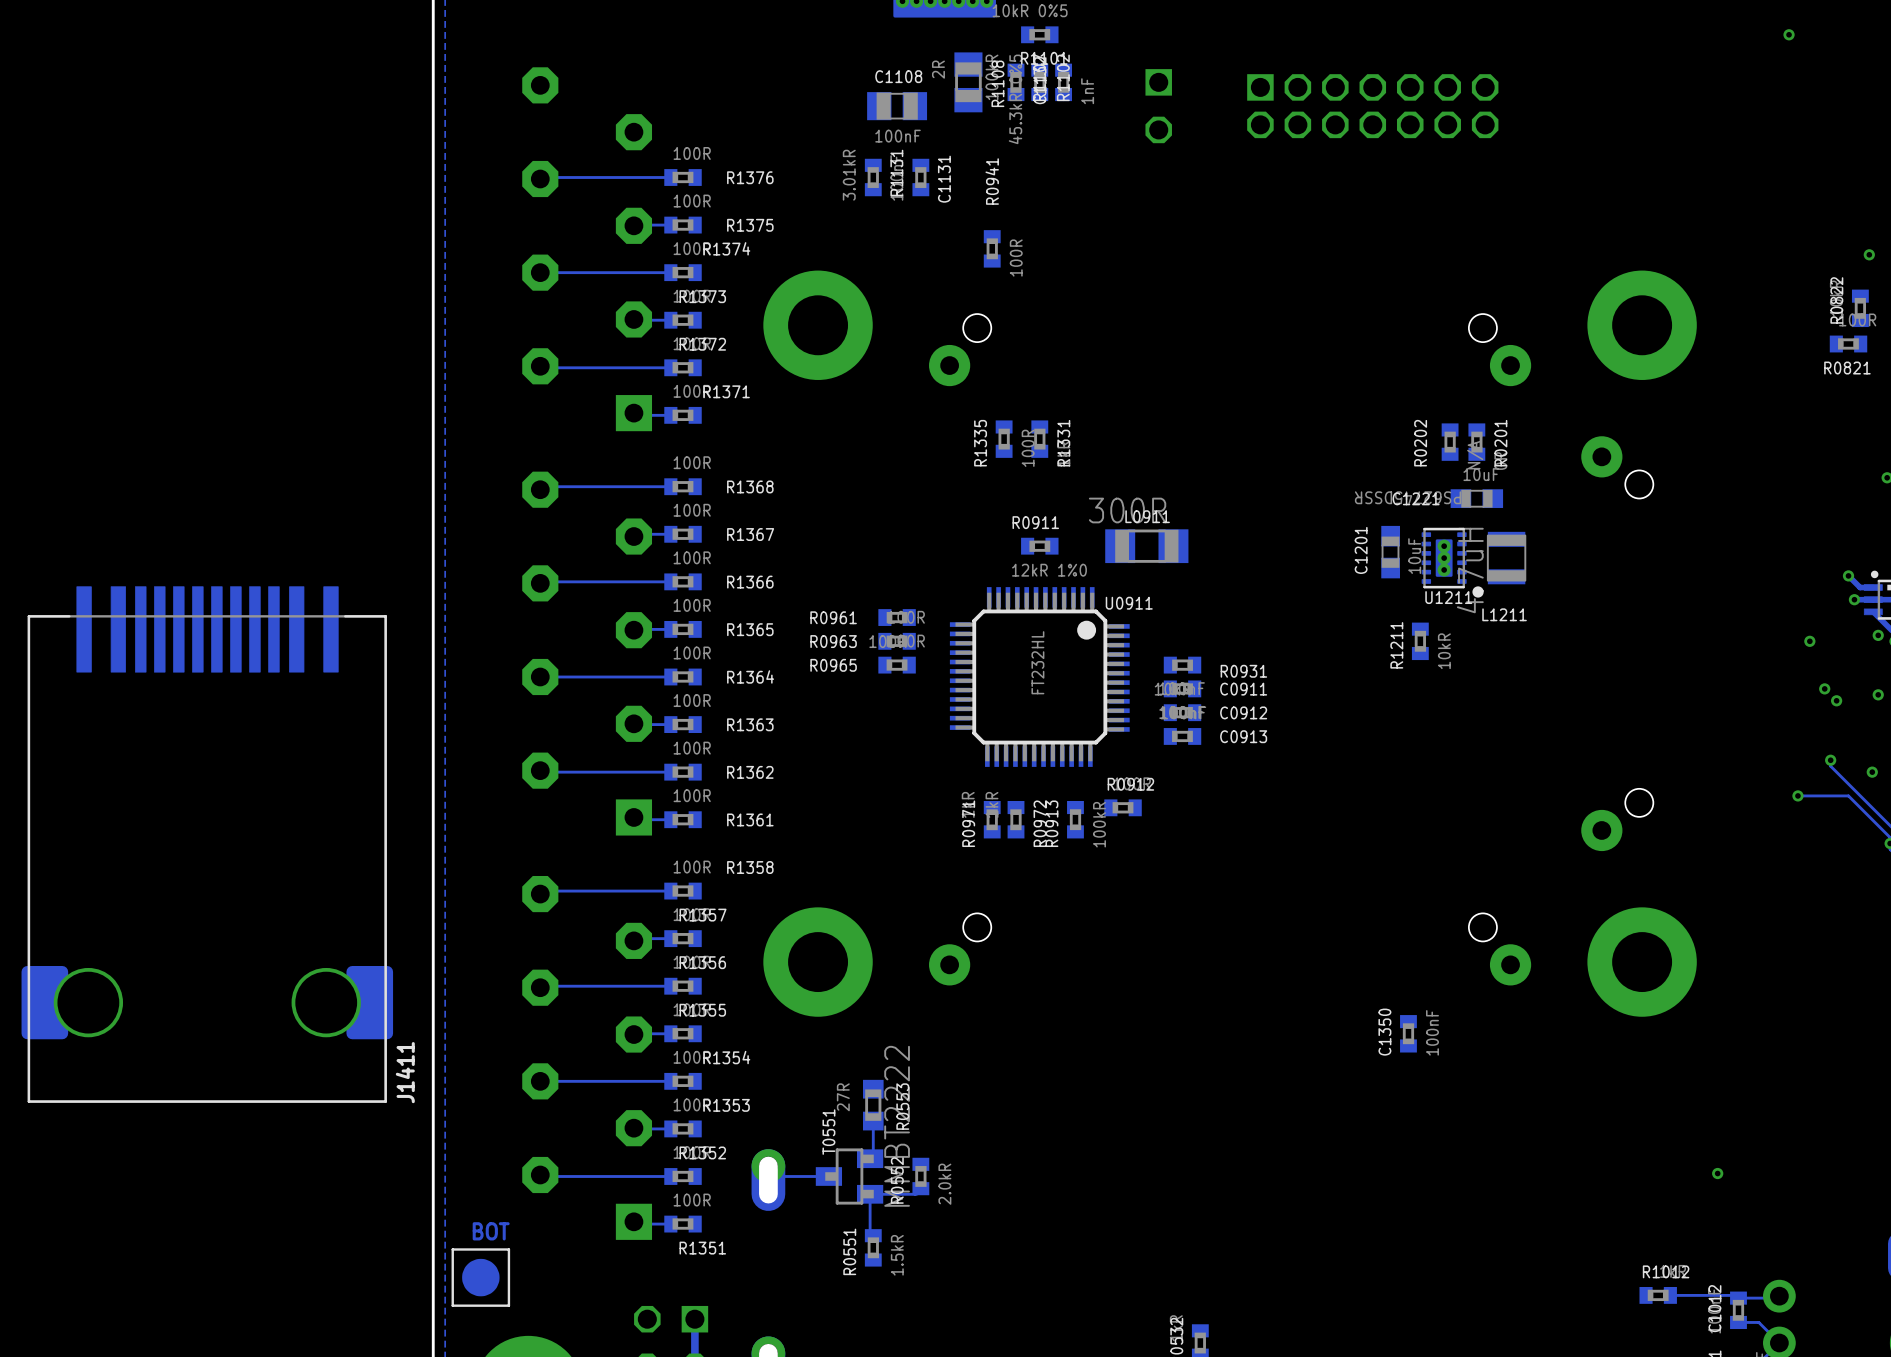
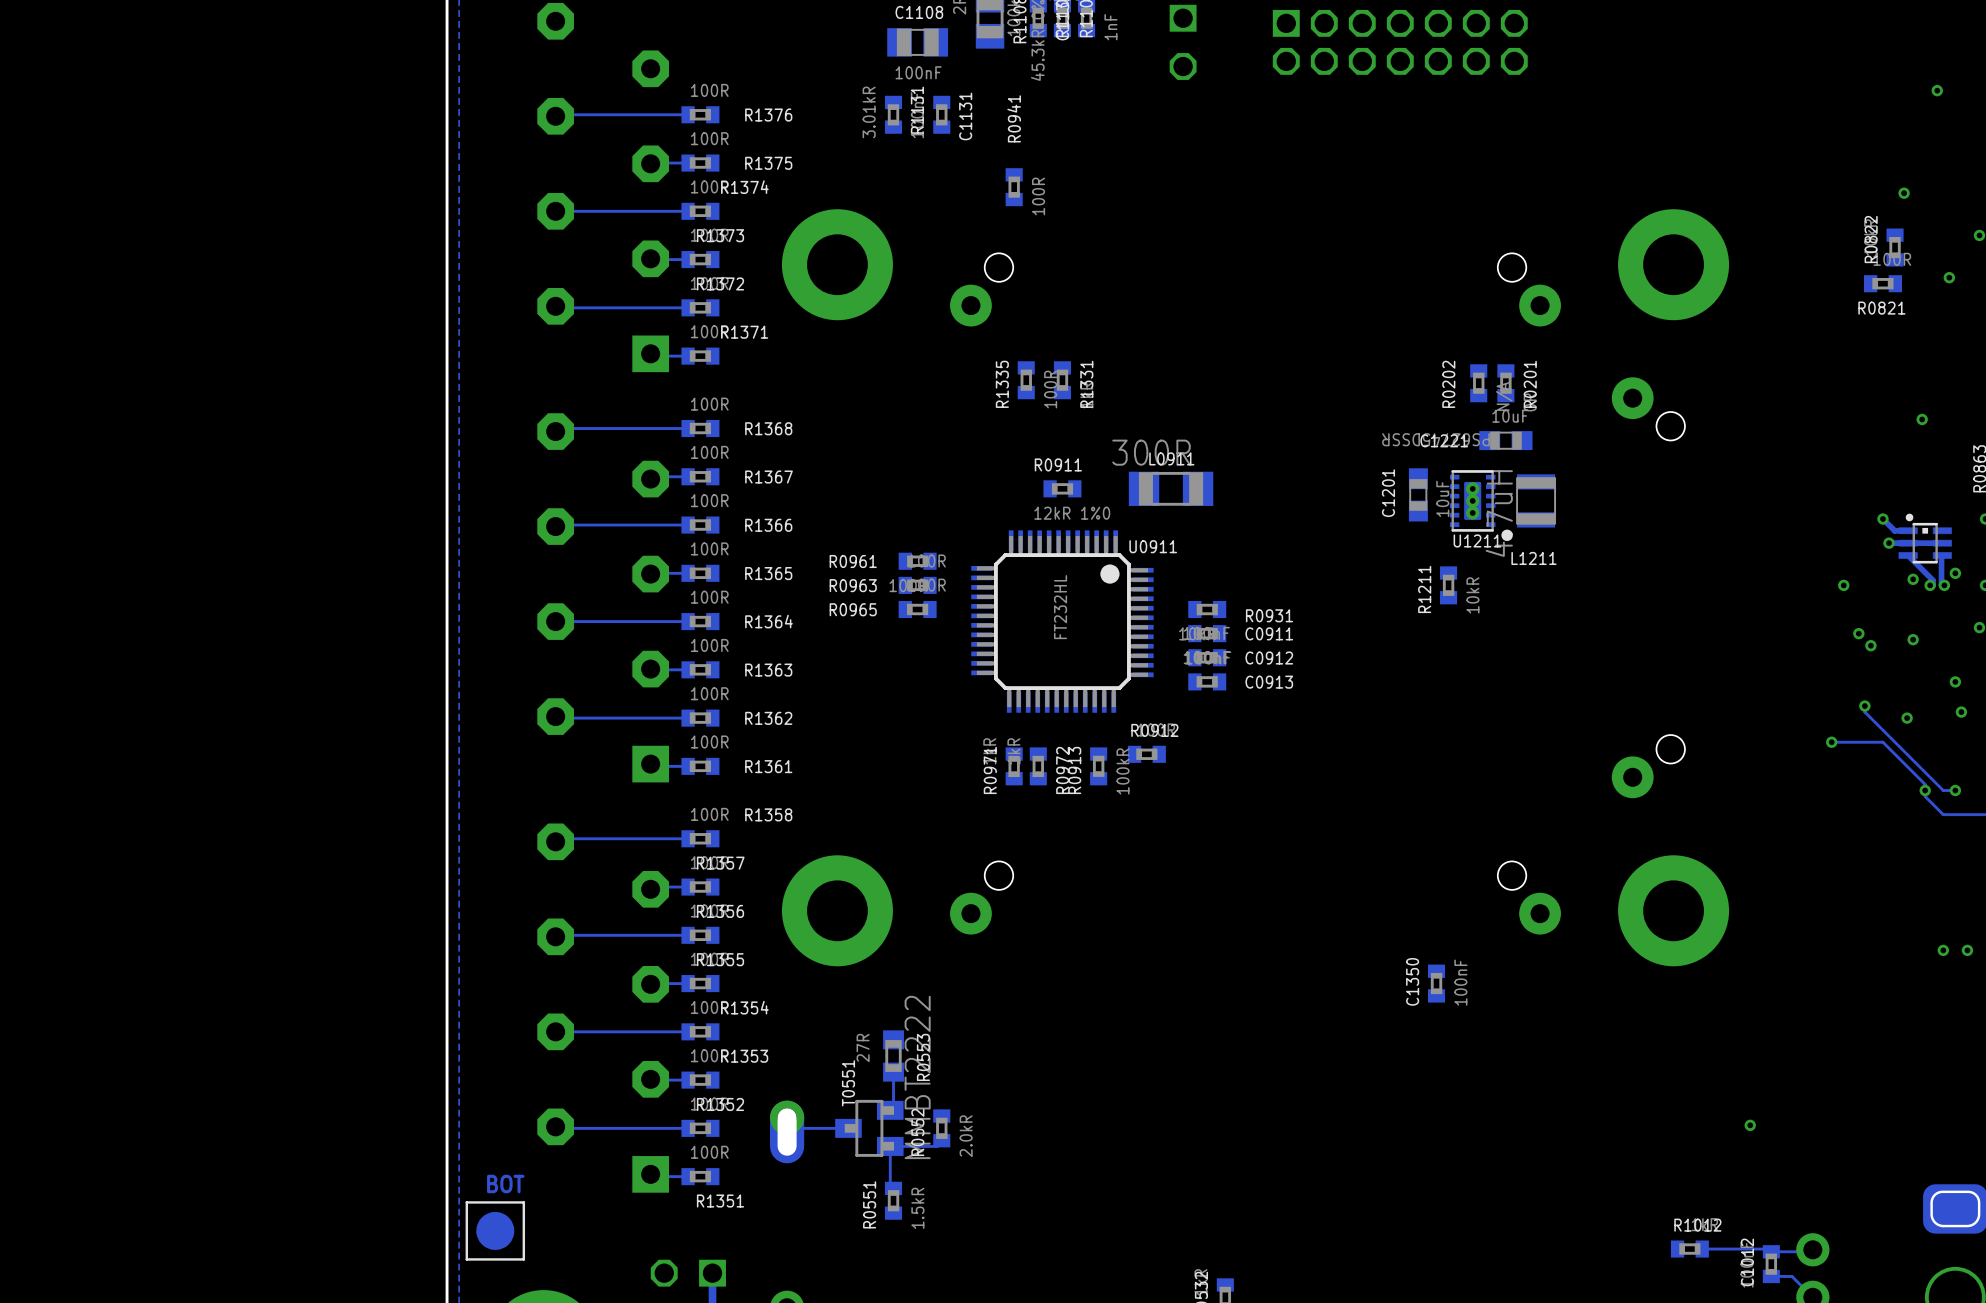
J1411: (207, 844) -> none

